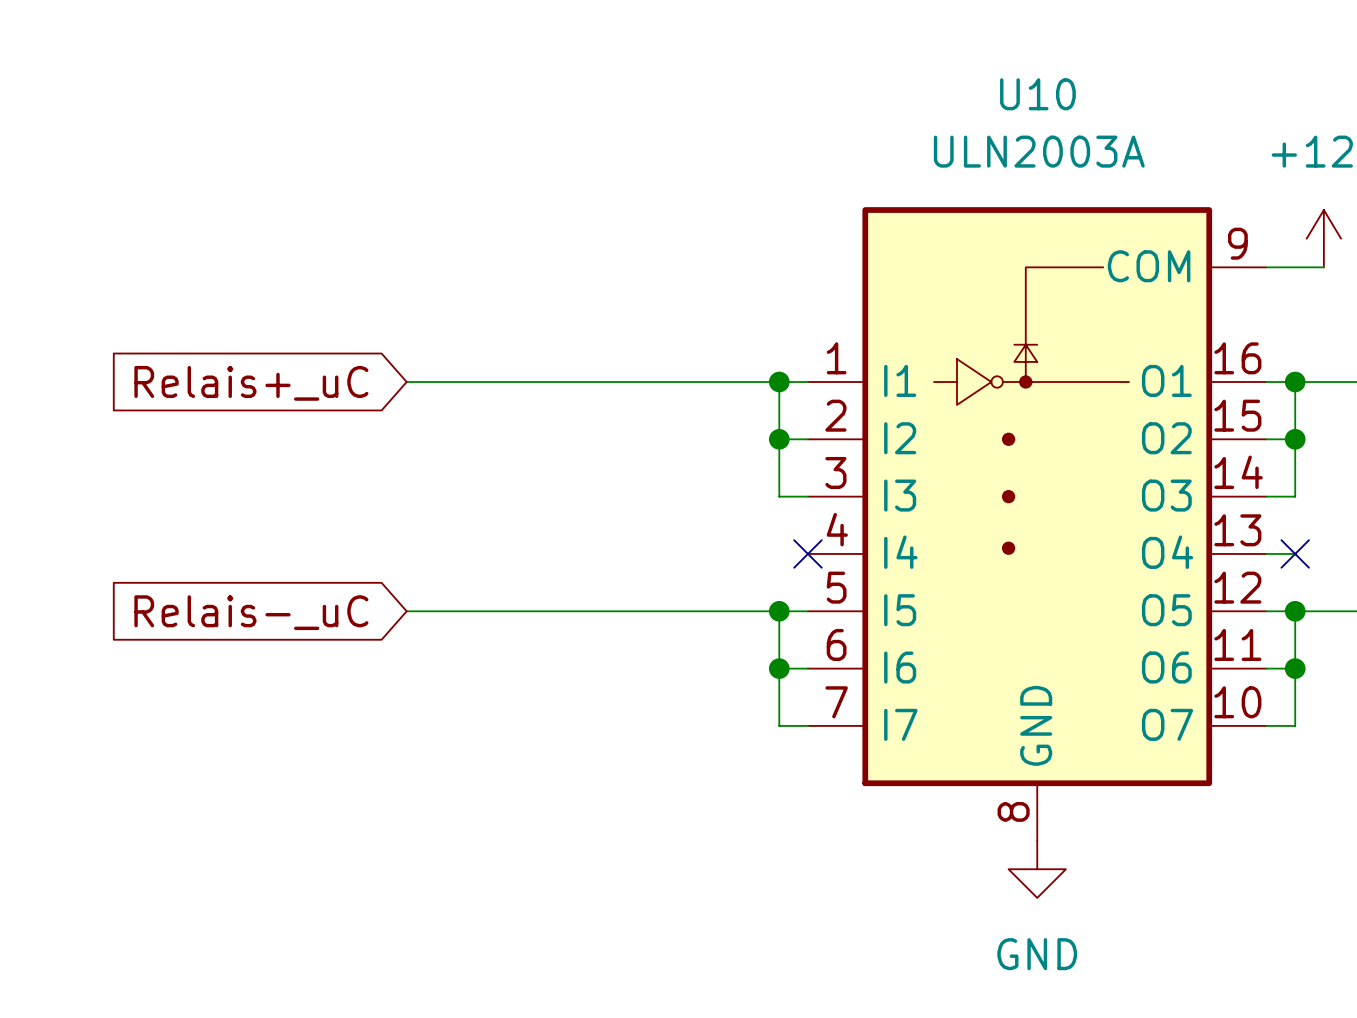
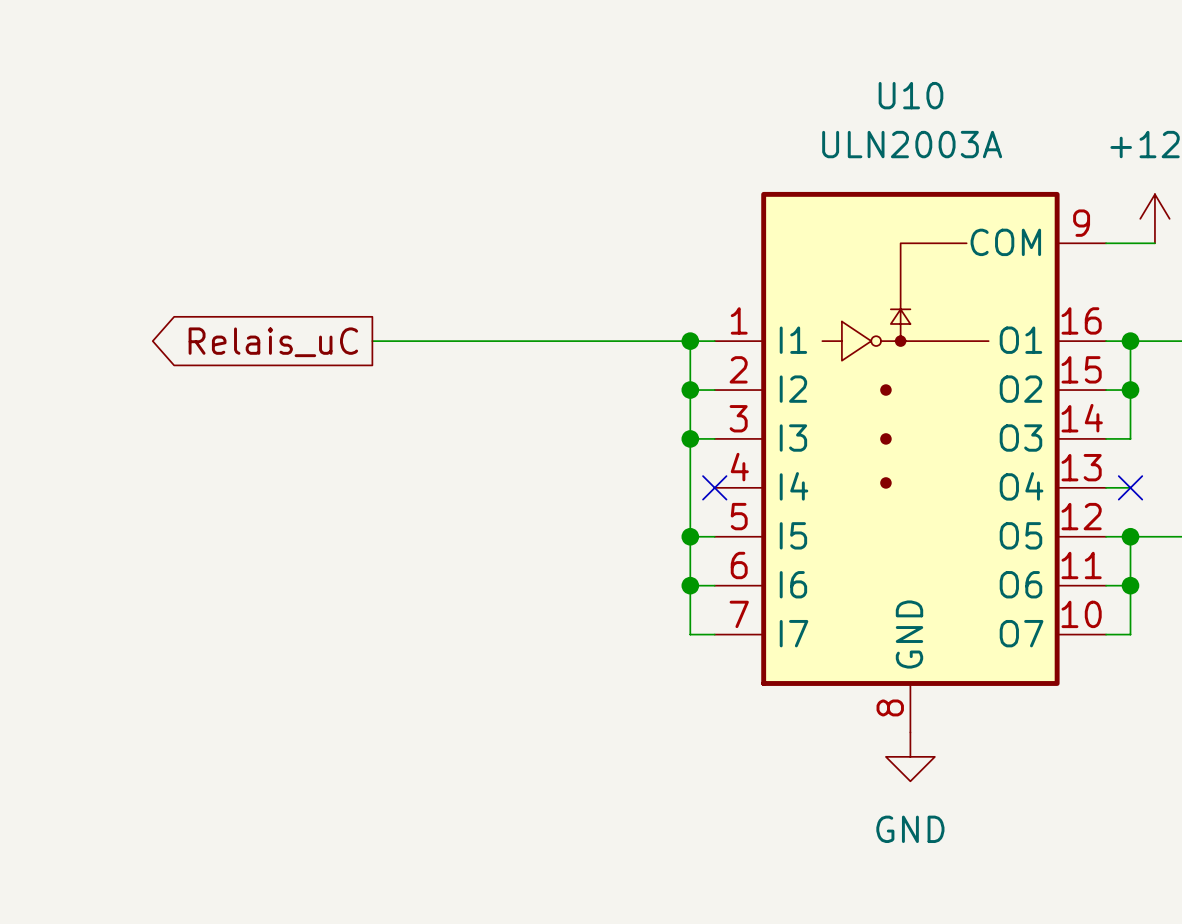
global label shape: input (251, 383) -> output (273, 342)
global label: Relais+_uC (251, 383) -> Relais_uC (273, 342)
junction: none -> (690, 438)
wire: (406, 611) (779, 611) -> (690, 438) (690, 536)
global label: Relais-_uC (251, 612) -> none

